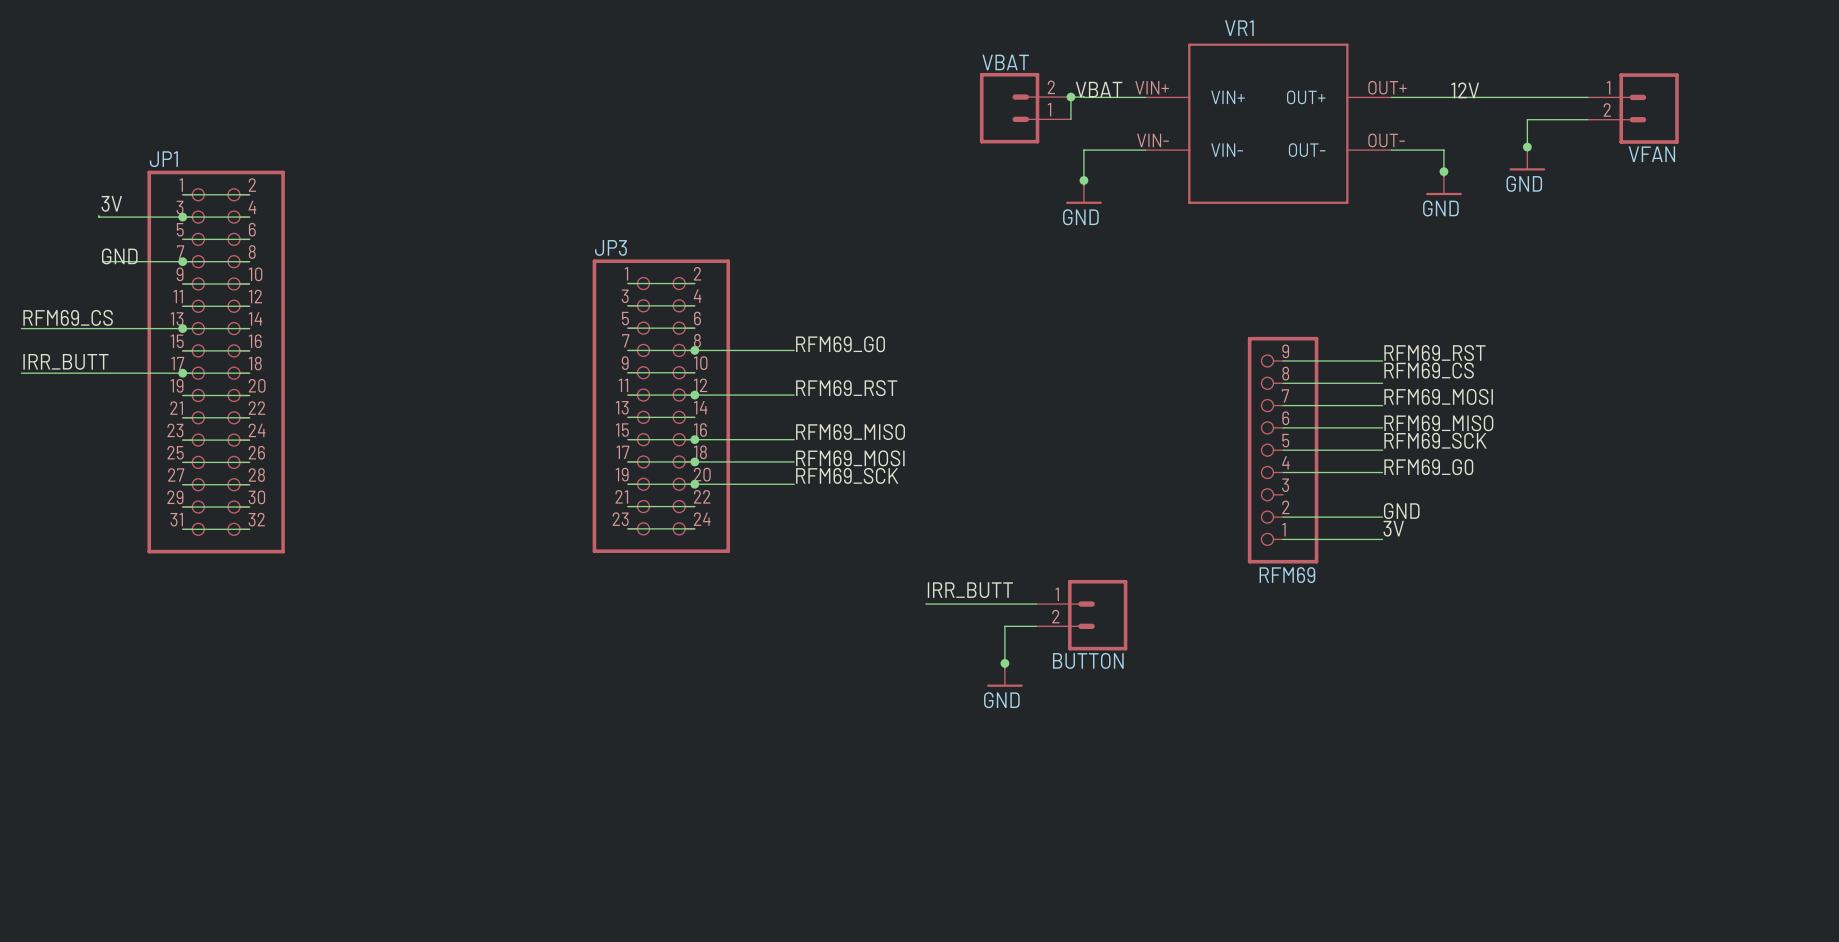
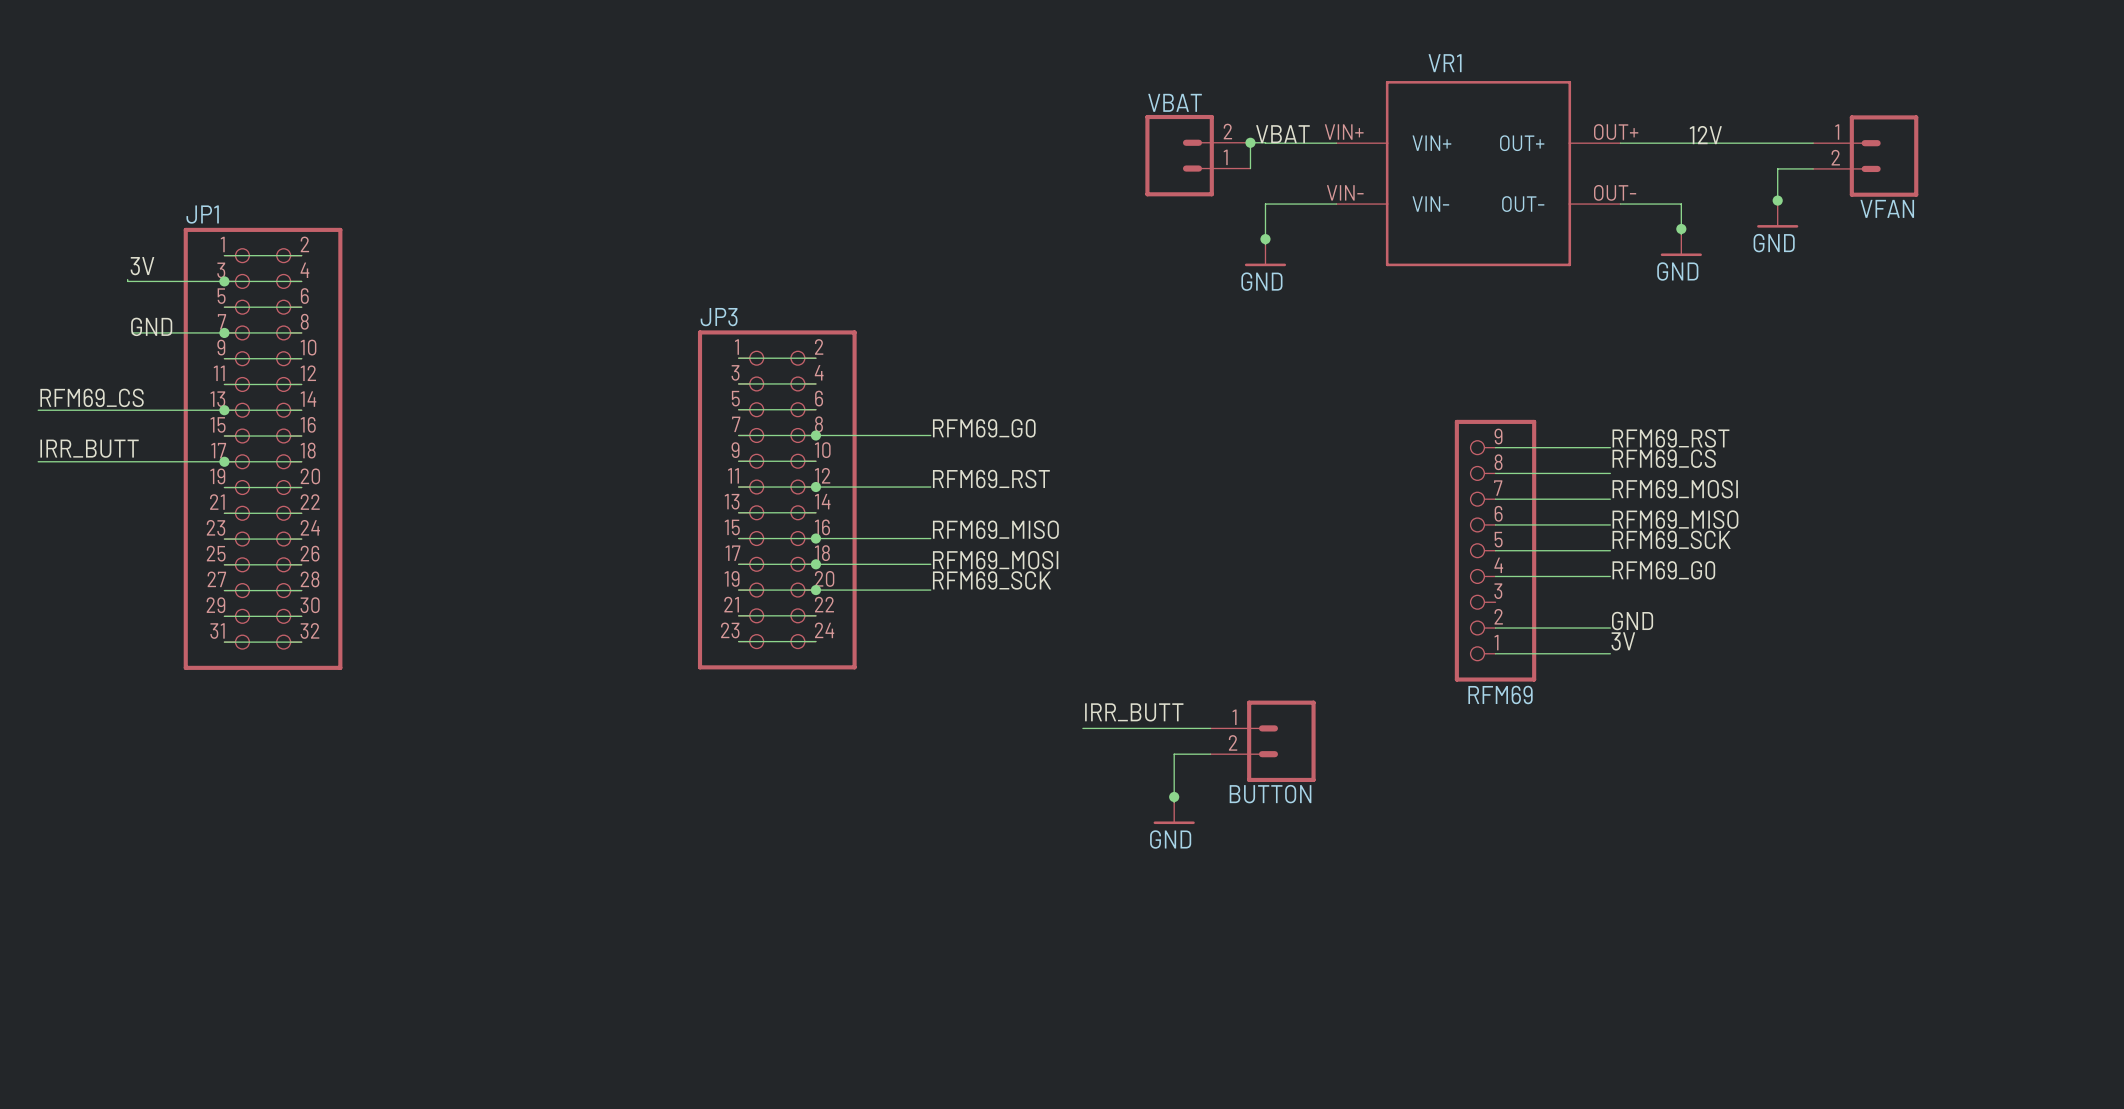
VFAN position: (1633, 108) -> (1865, 156)

